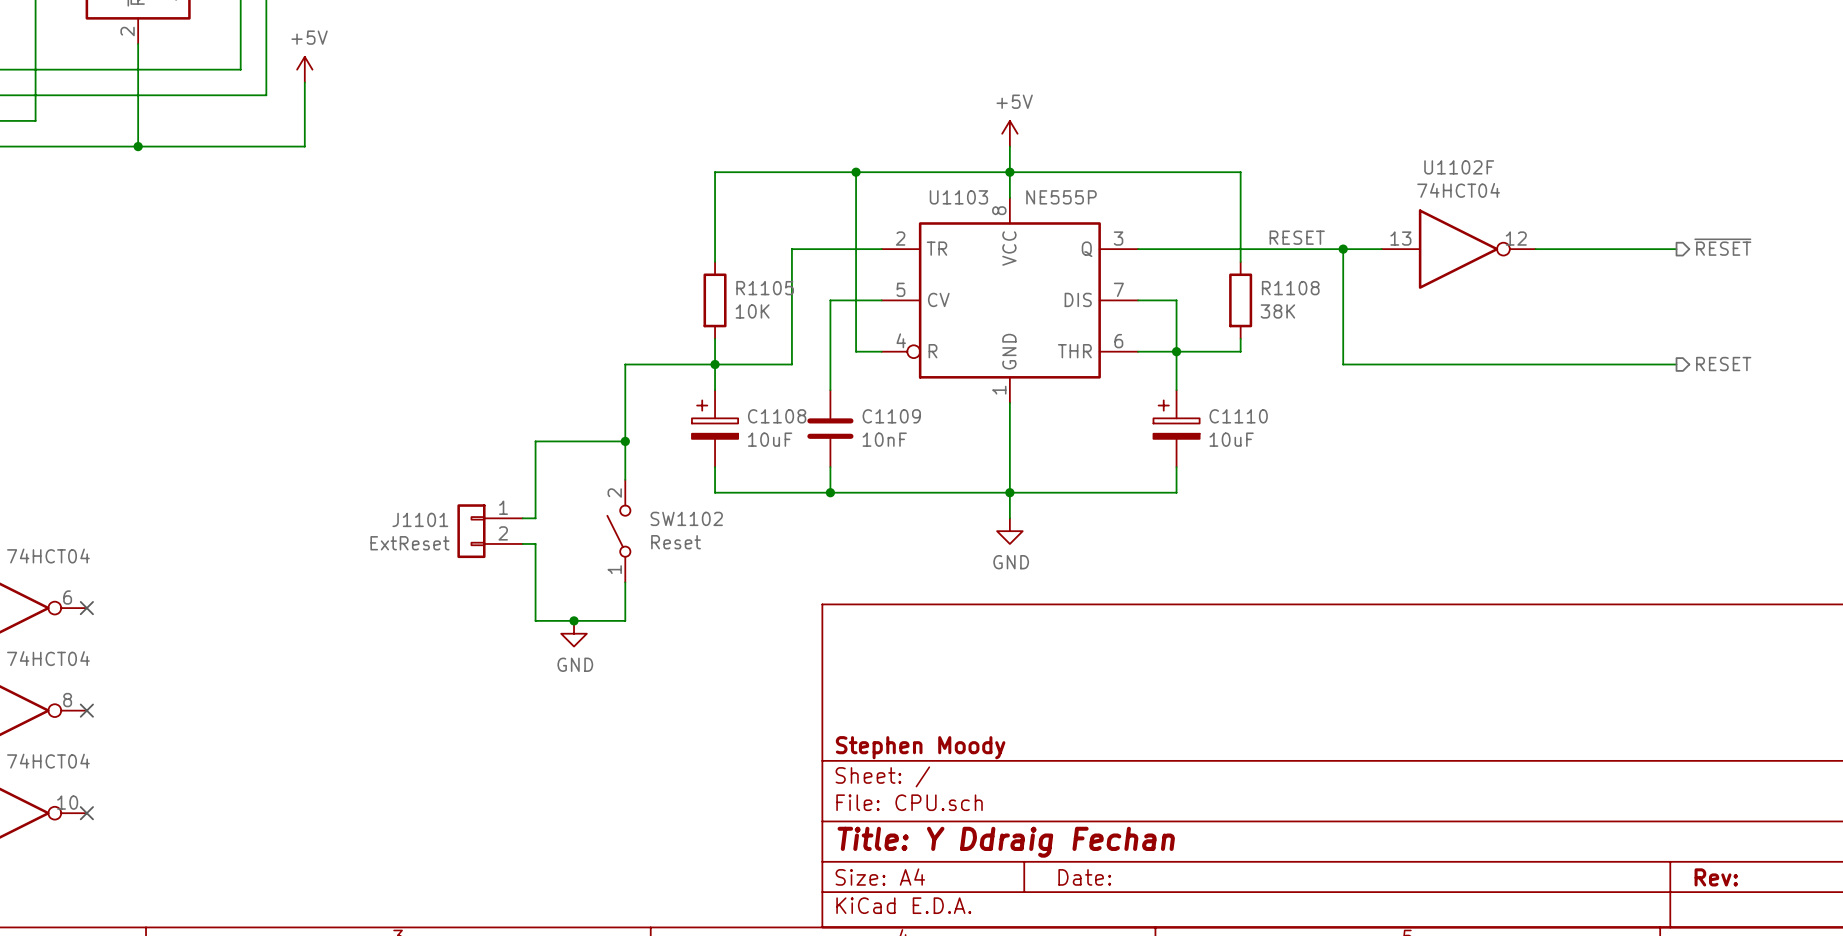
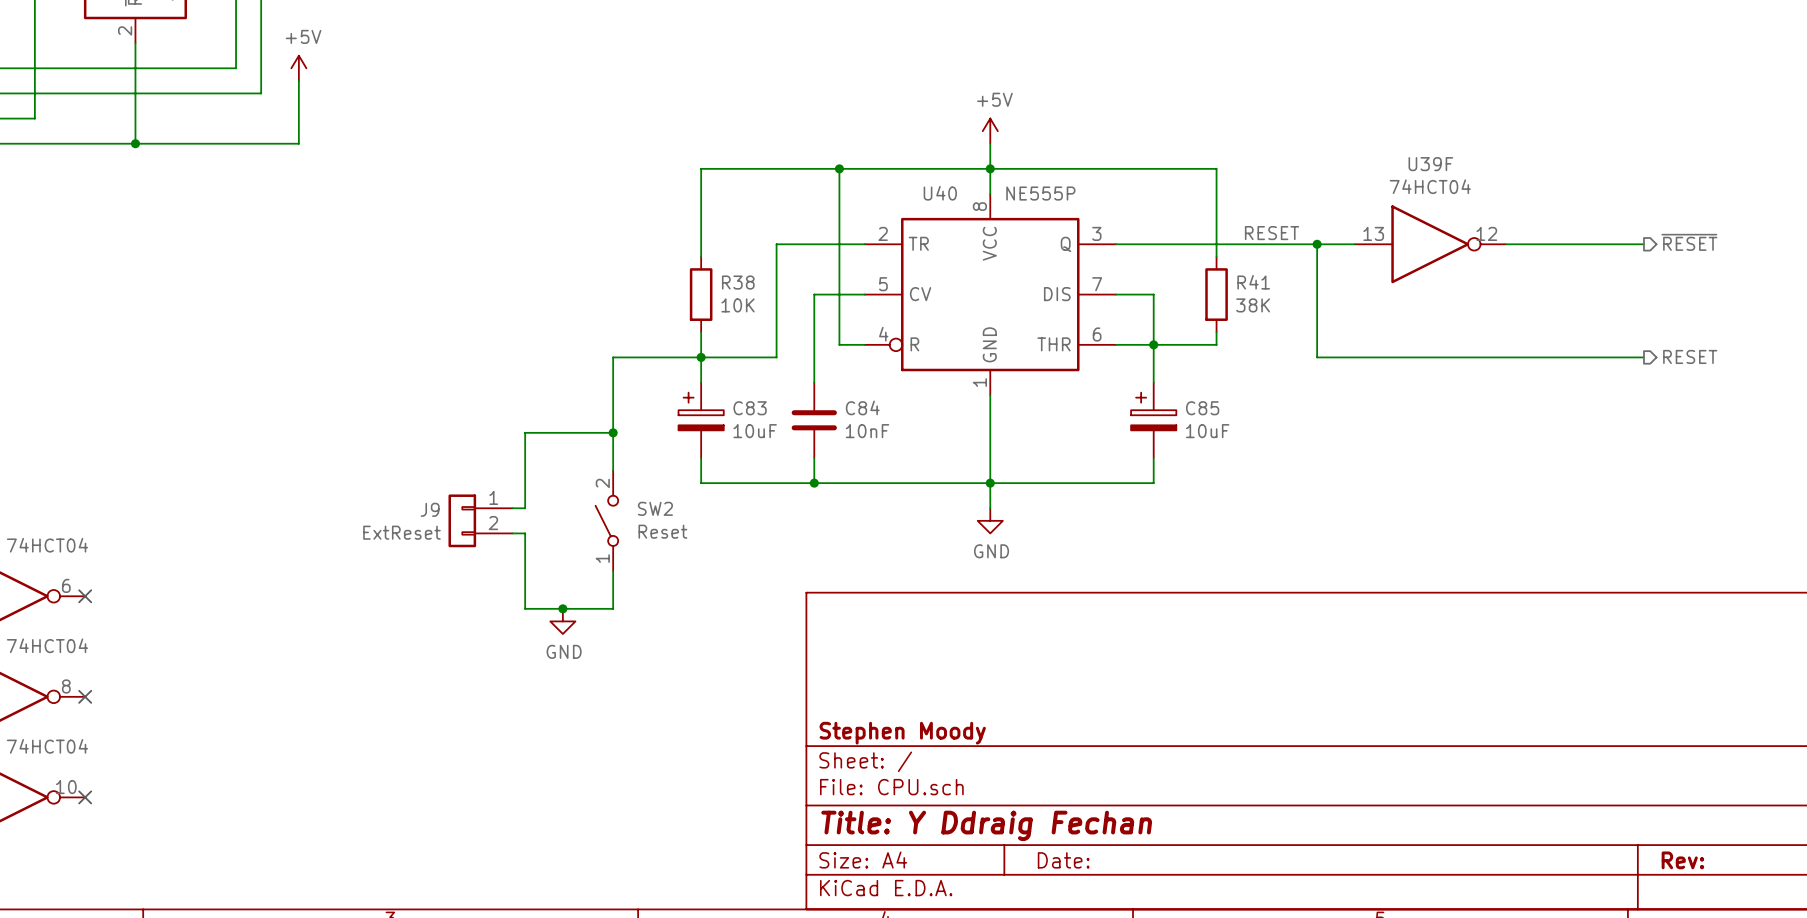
U1102F name: U1102F (1459, 167) -> U39F (1430, 164)
U1103 name: U1103 (958, 197) -> U40 (940, 193)
R1105 name: R1105 (765, 288) -> R38 (738, 282)
R1108 name: R1108 (1290, 288) -> R41 (1253, 282)
C1108 name: C1108 (777, 416) -> C83 (750, 408)
C1109 name: C1109 (891, 416) -> C84 (862, 407)
C1110 name: C1110 (1238, 416) -> C85 (1202, 408)
SW1102 name: SW1102 (686, 518) -> SW2 (655, 508)
J1101 name: J1101 (420, 519) -> J9 (430, 509)

